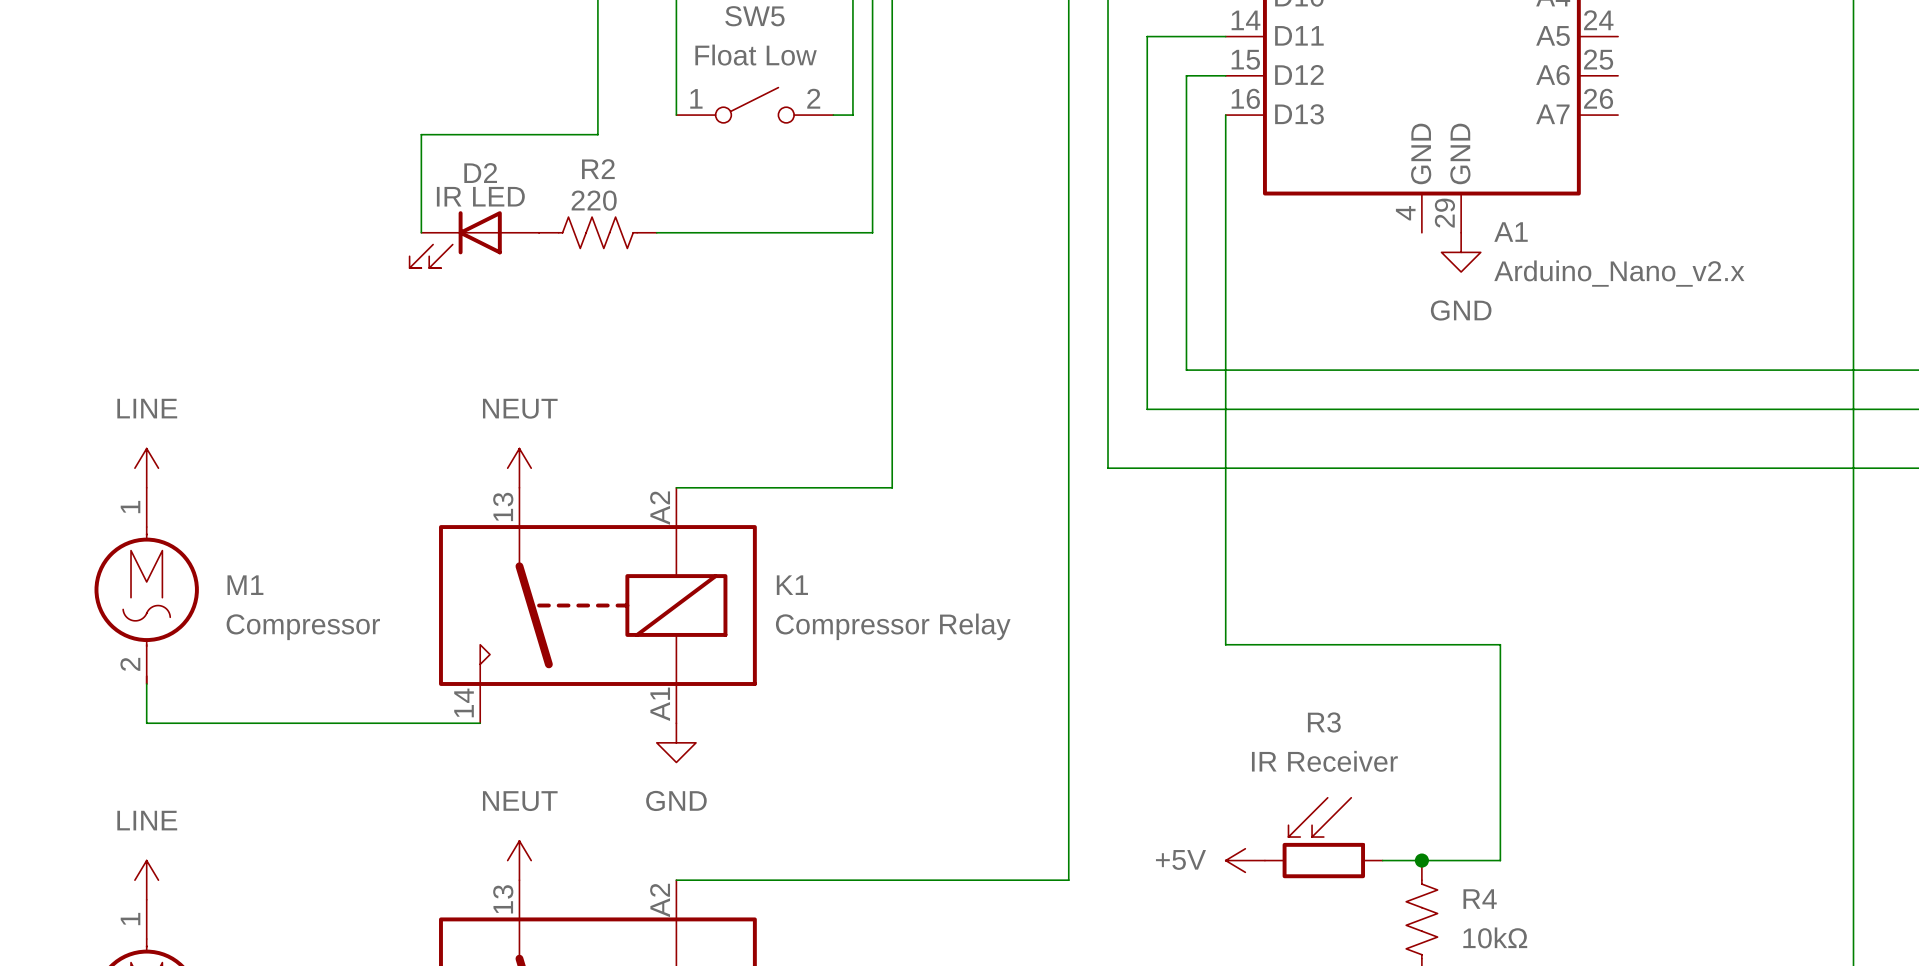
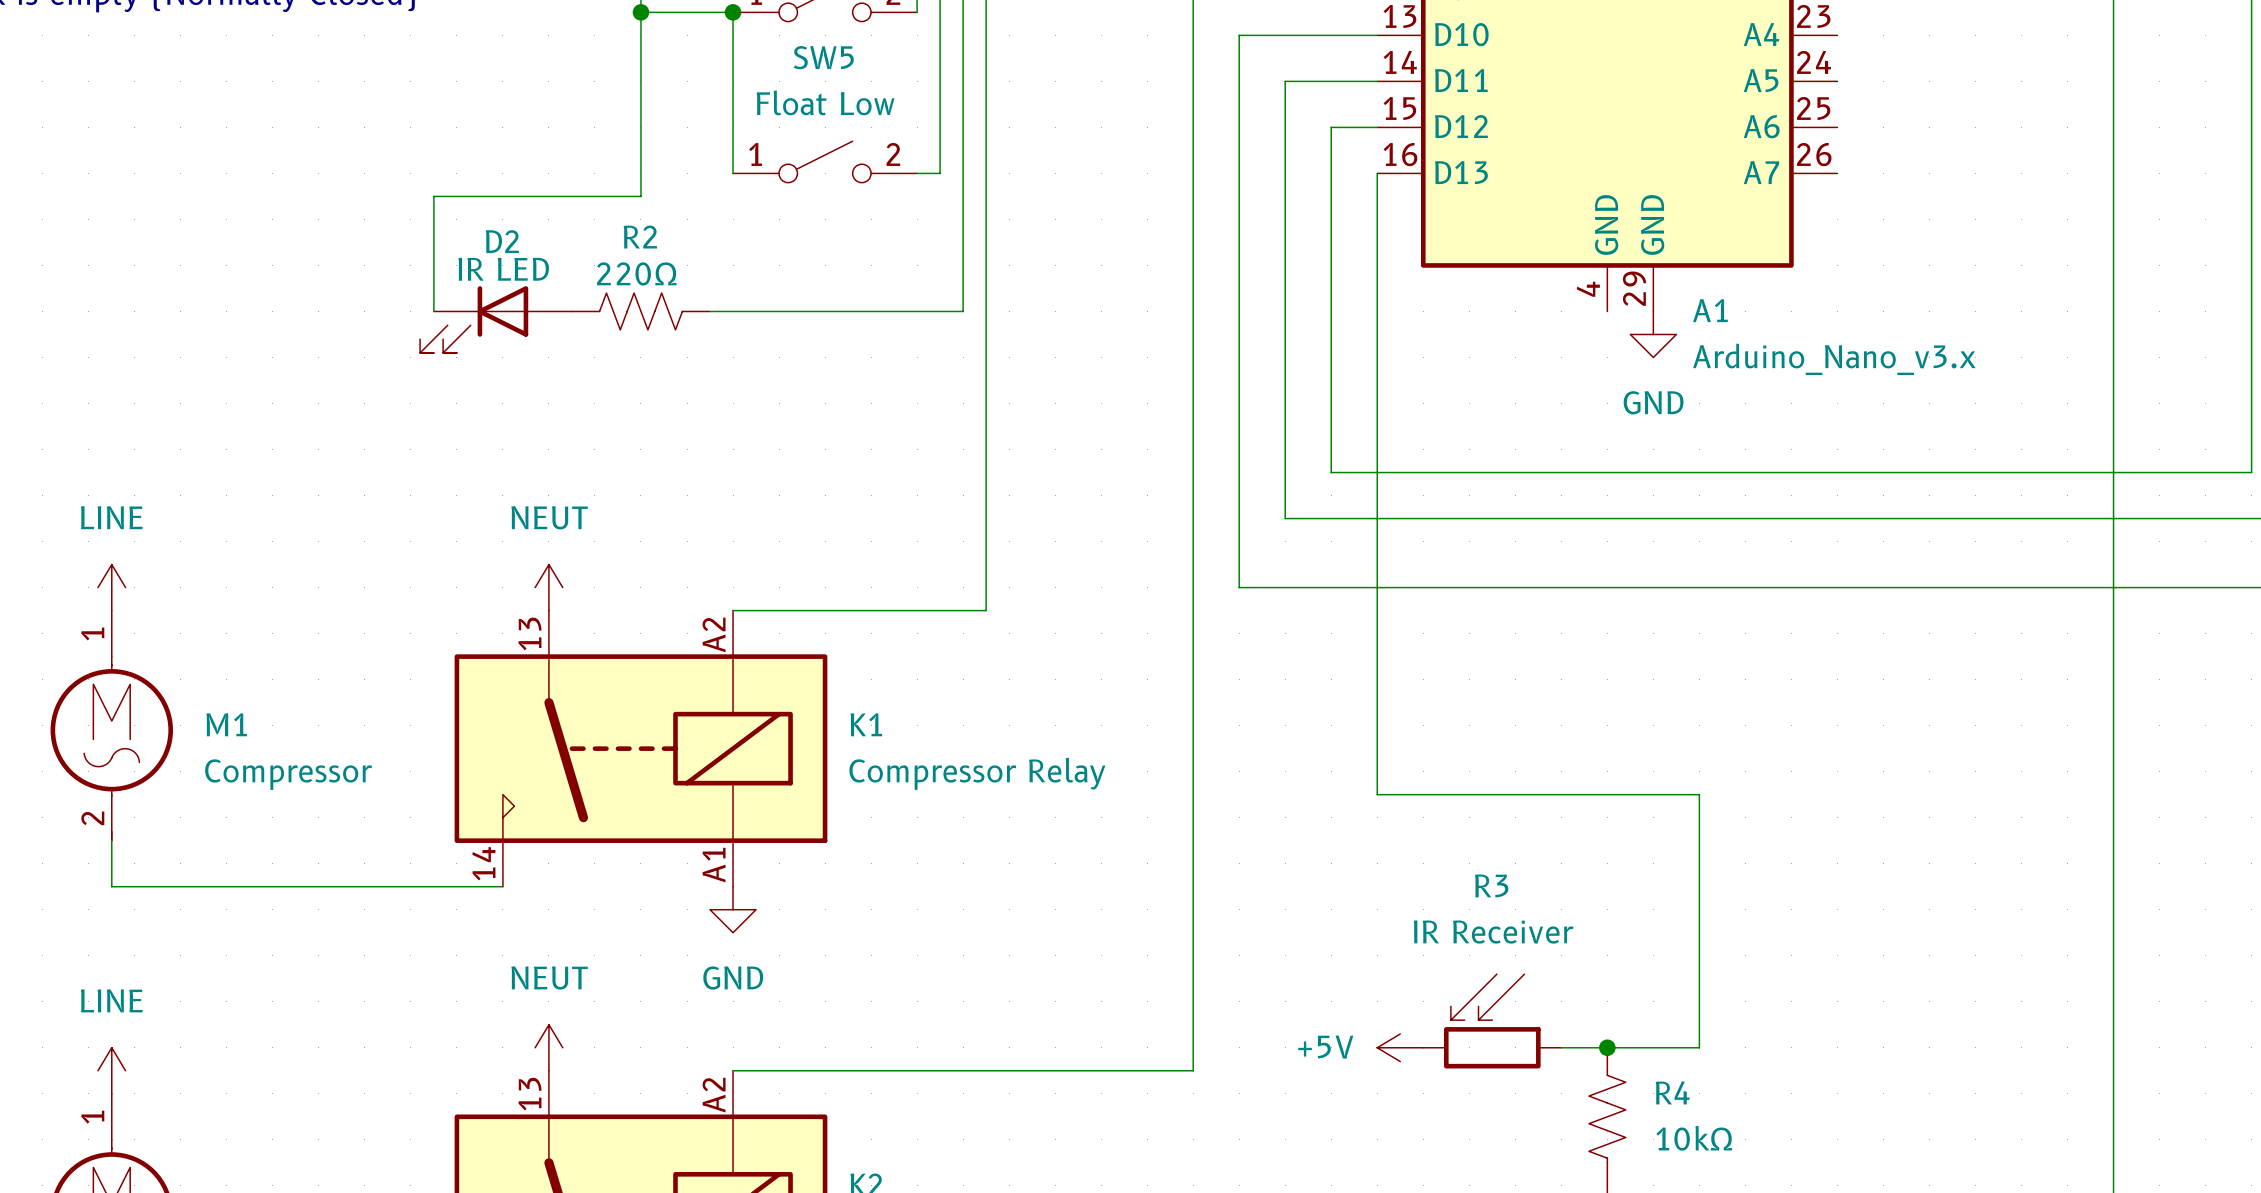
R2 value: 220 (594, 200) -> 220Ω (636, 273)
A1 value: Arduino_Nano_v2.x (1619, 273) -> Arduino_Nano_v3.x (1834, 359)

